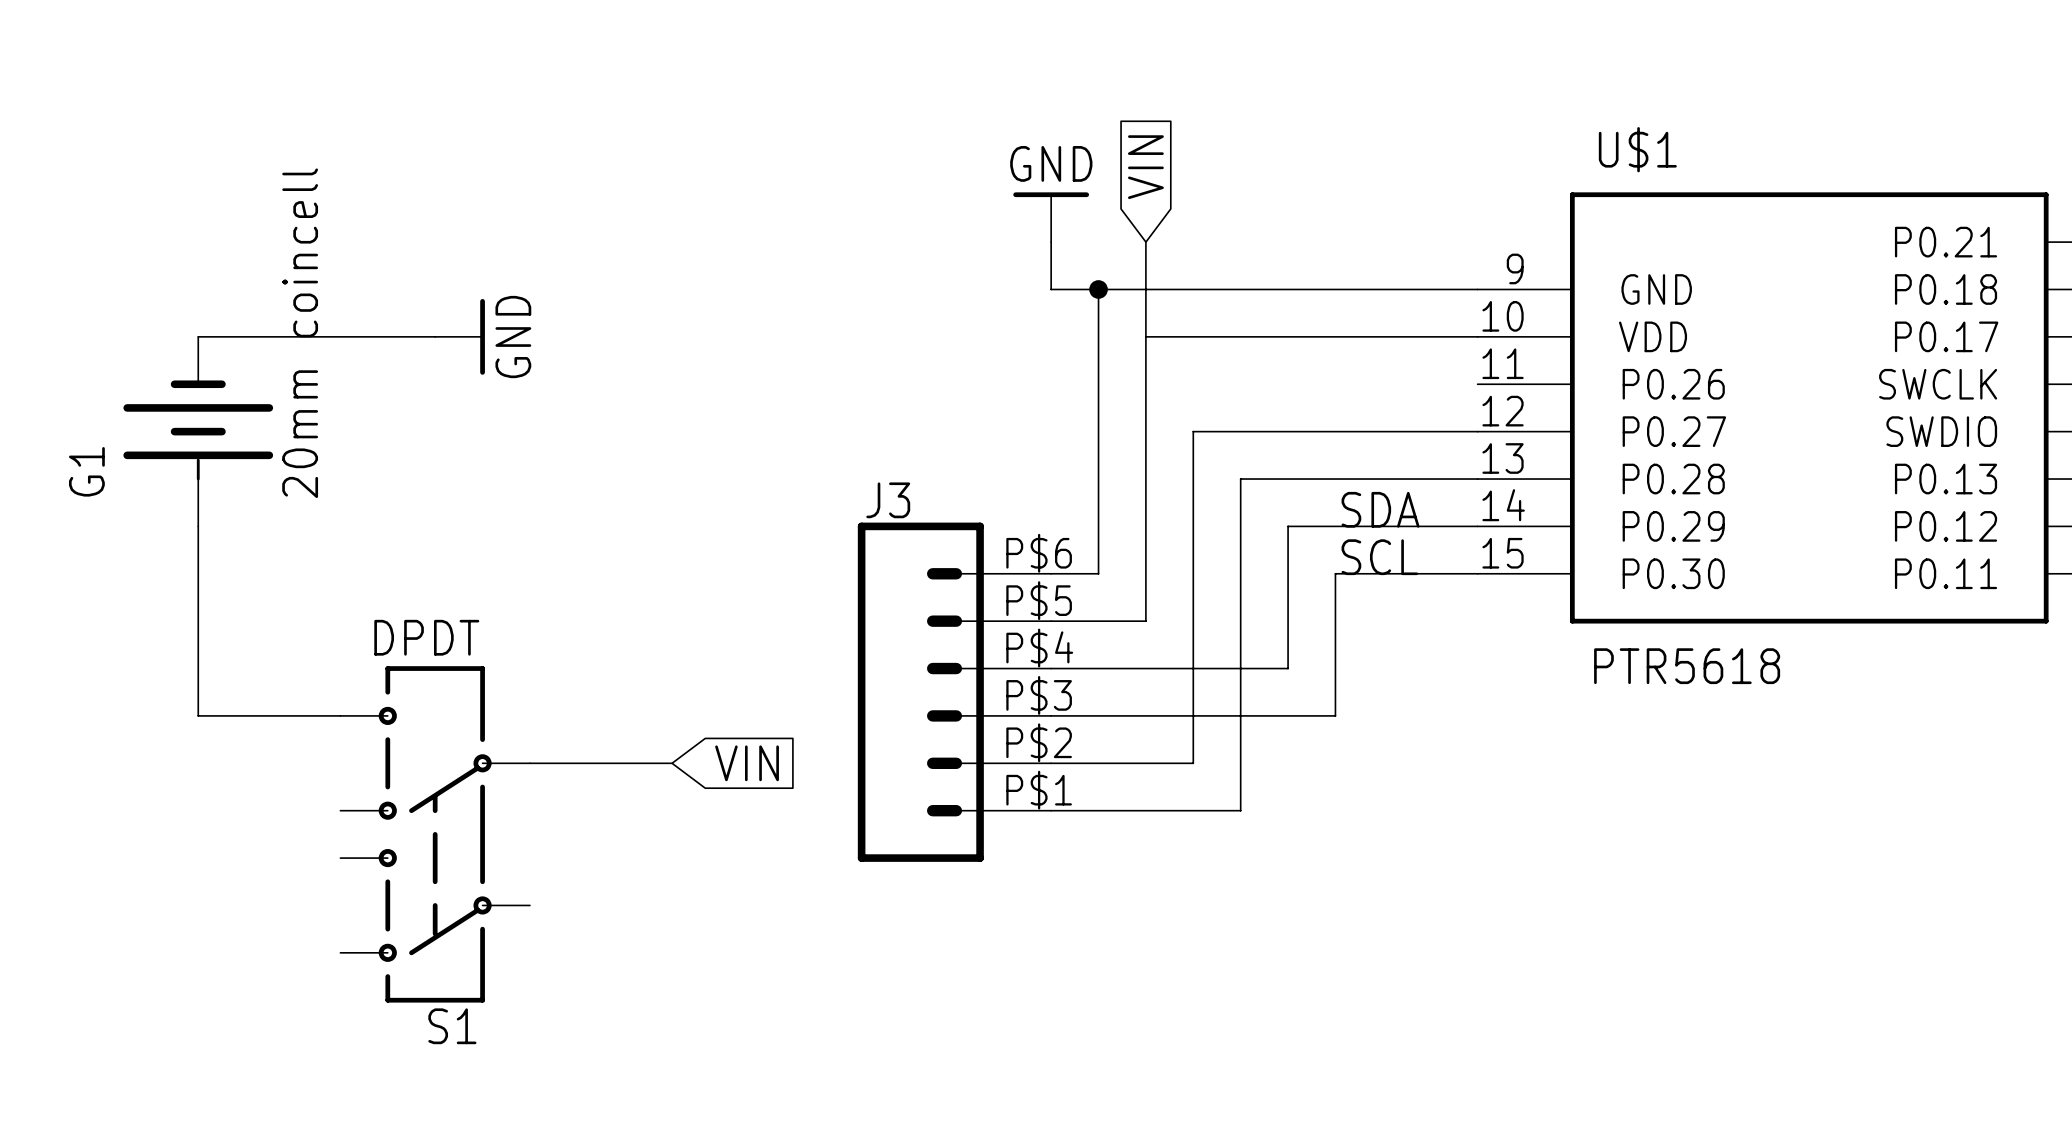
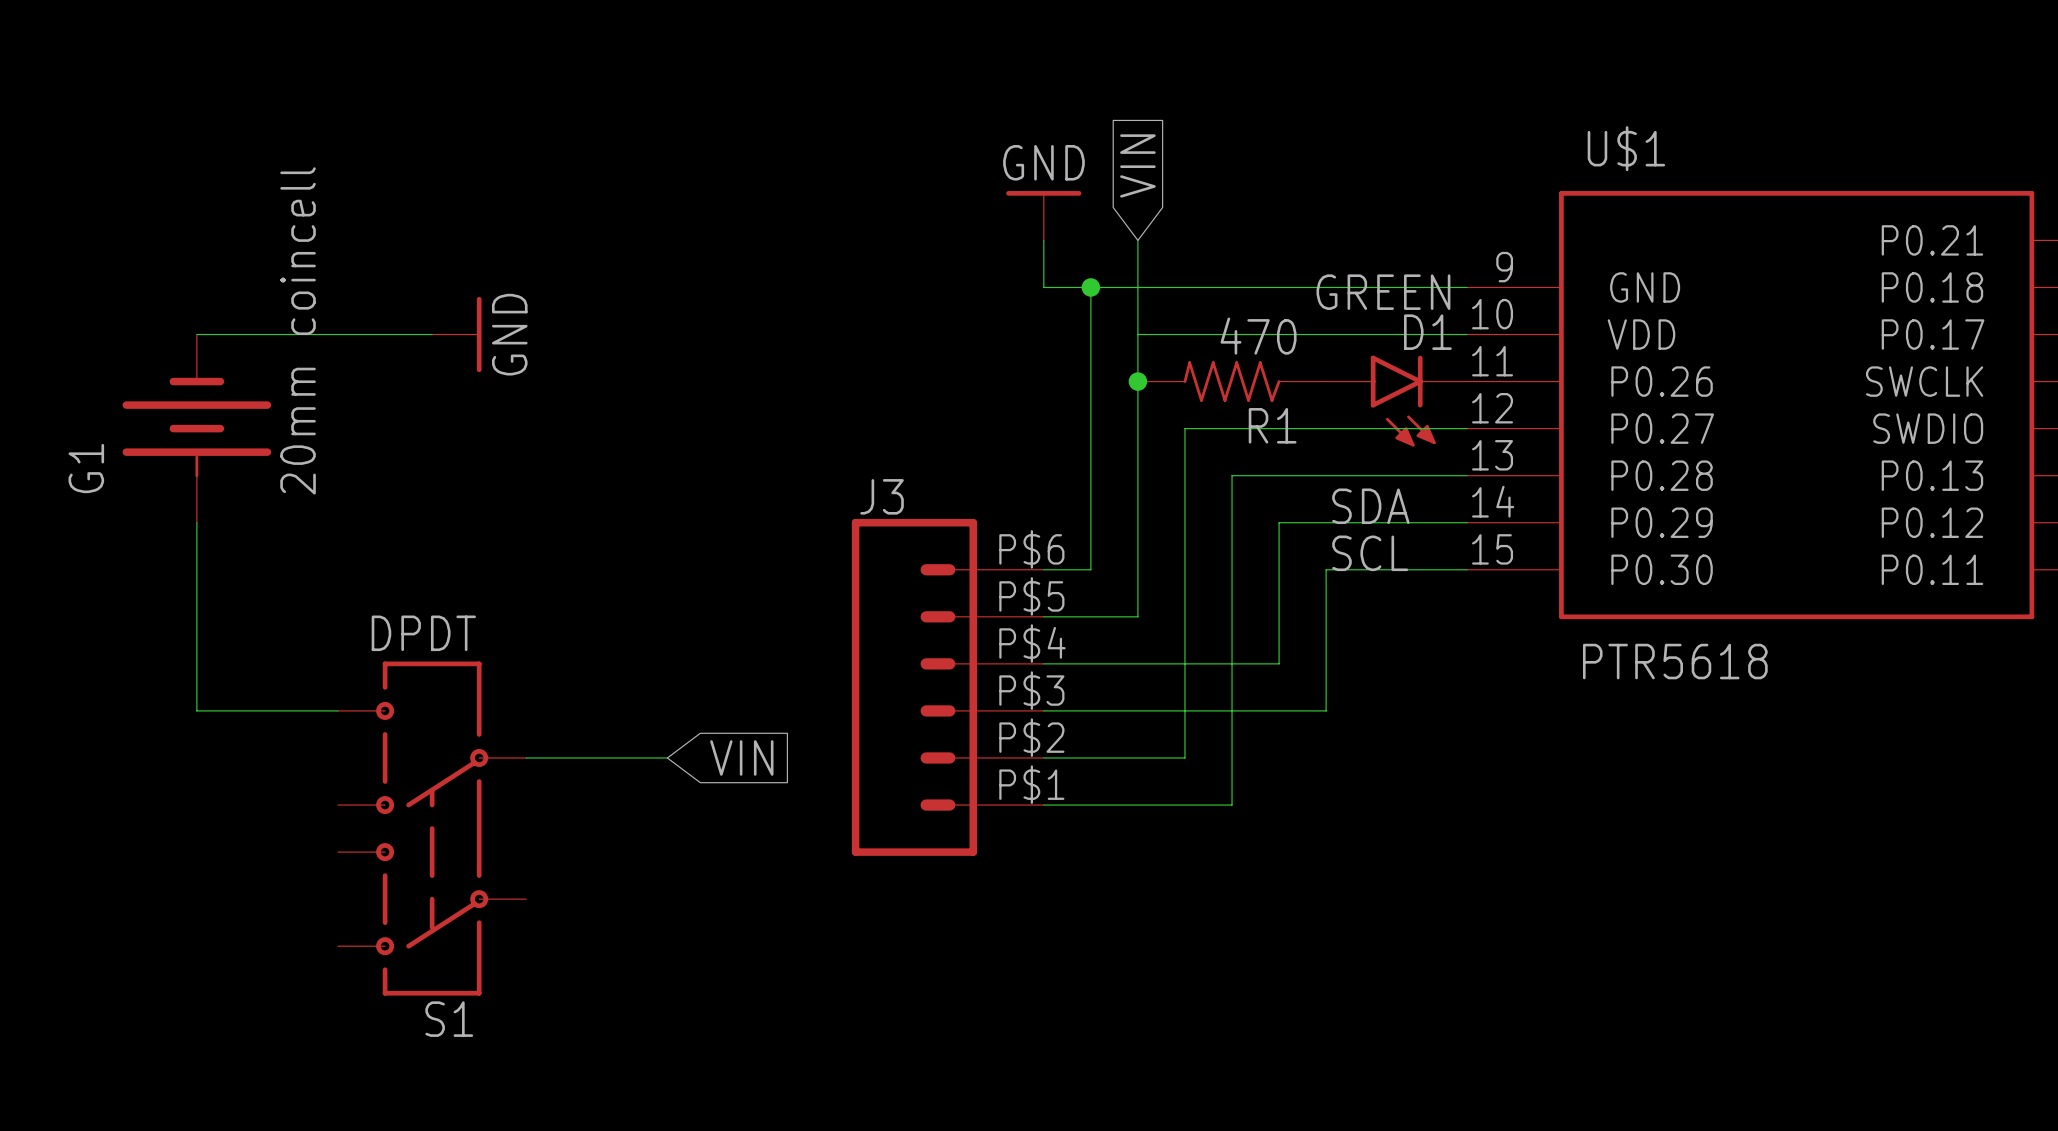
junction: none -> (1137, 381)
R1: none -> 470 (1232, 381)
D1: none -> GREEN (1396, 401)

